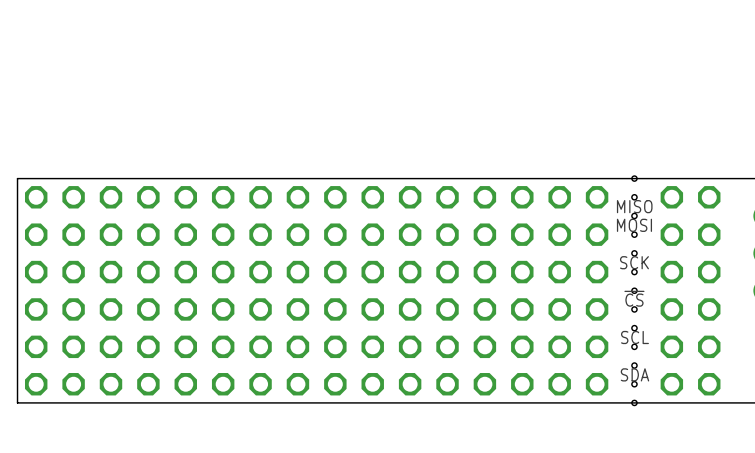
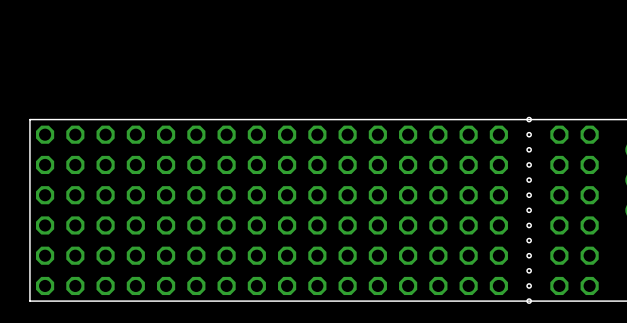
text: MISO (634, 206) -> none
text: MOSI (634, 225) -> none
text: SCK (634, 262) -> none
text: ~{CS} (634, 298) -> none
text: SCL (634, 337) -> none
text: SDA (634, 374) -> none

